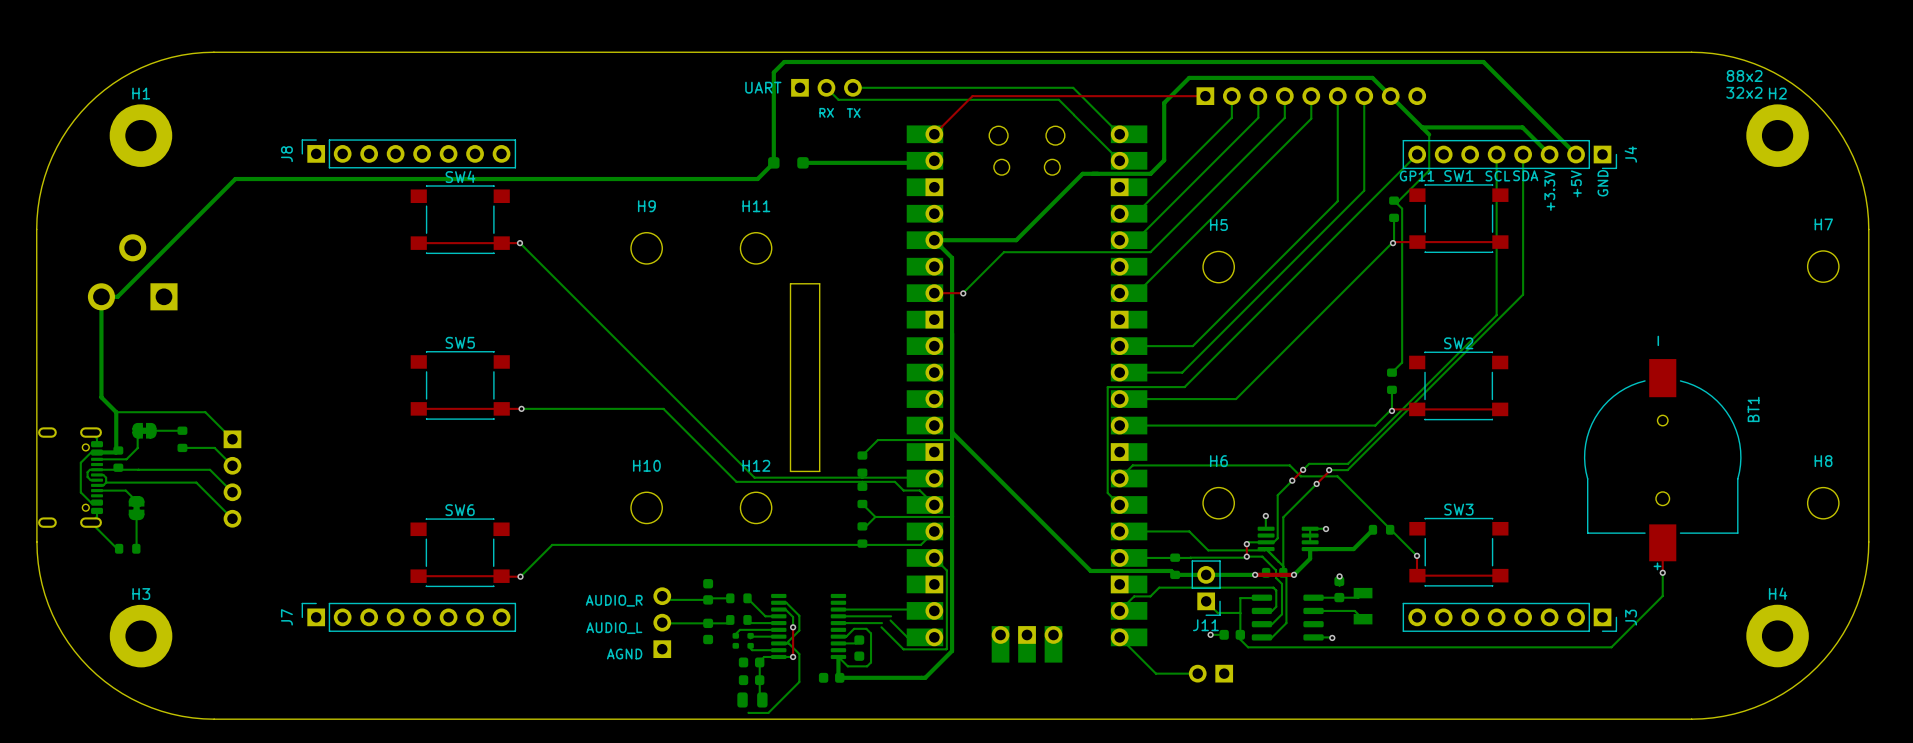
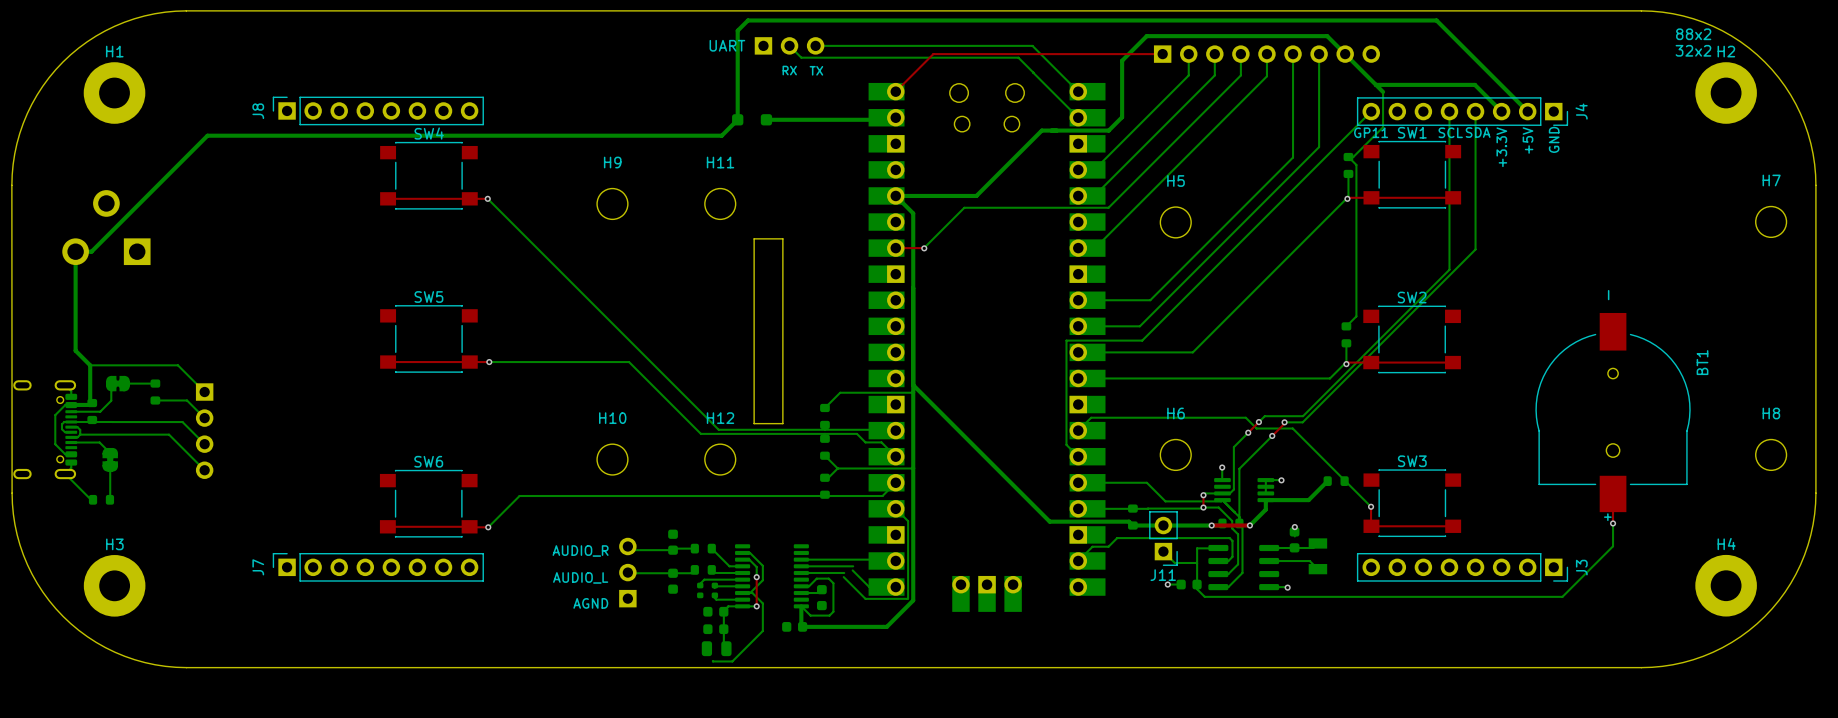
bottom track: (1119, 637) (1155, 673) (1197, 673) -> none
part: (1210, 673) -> none

